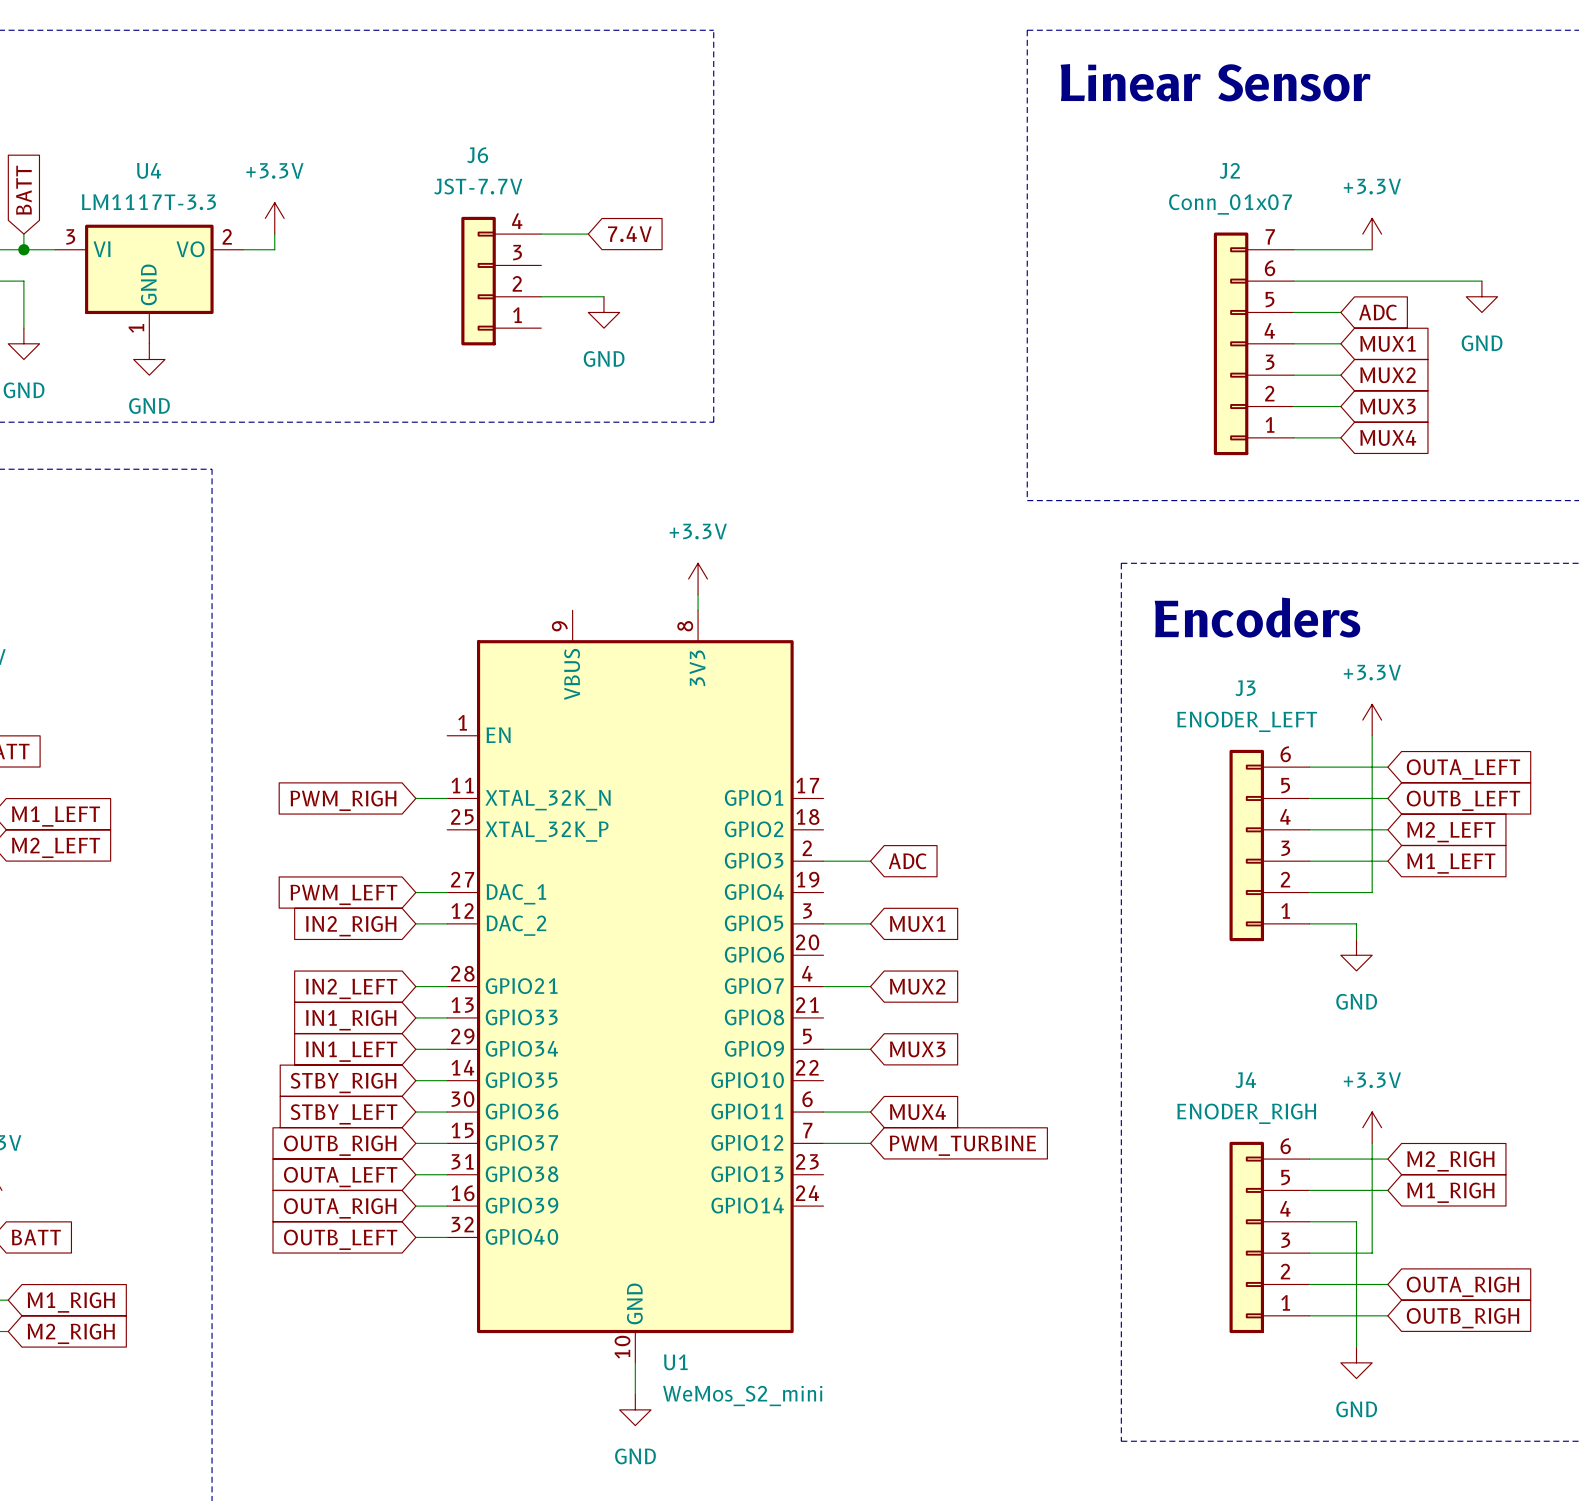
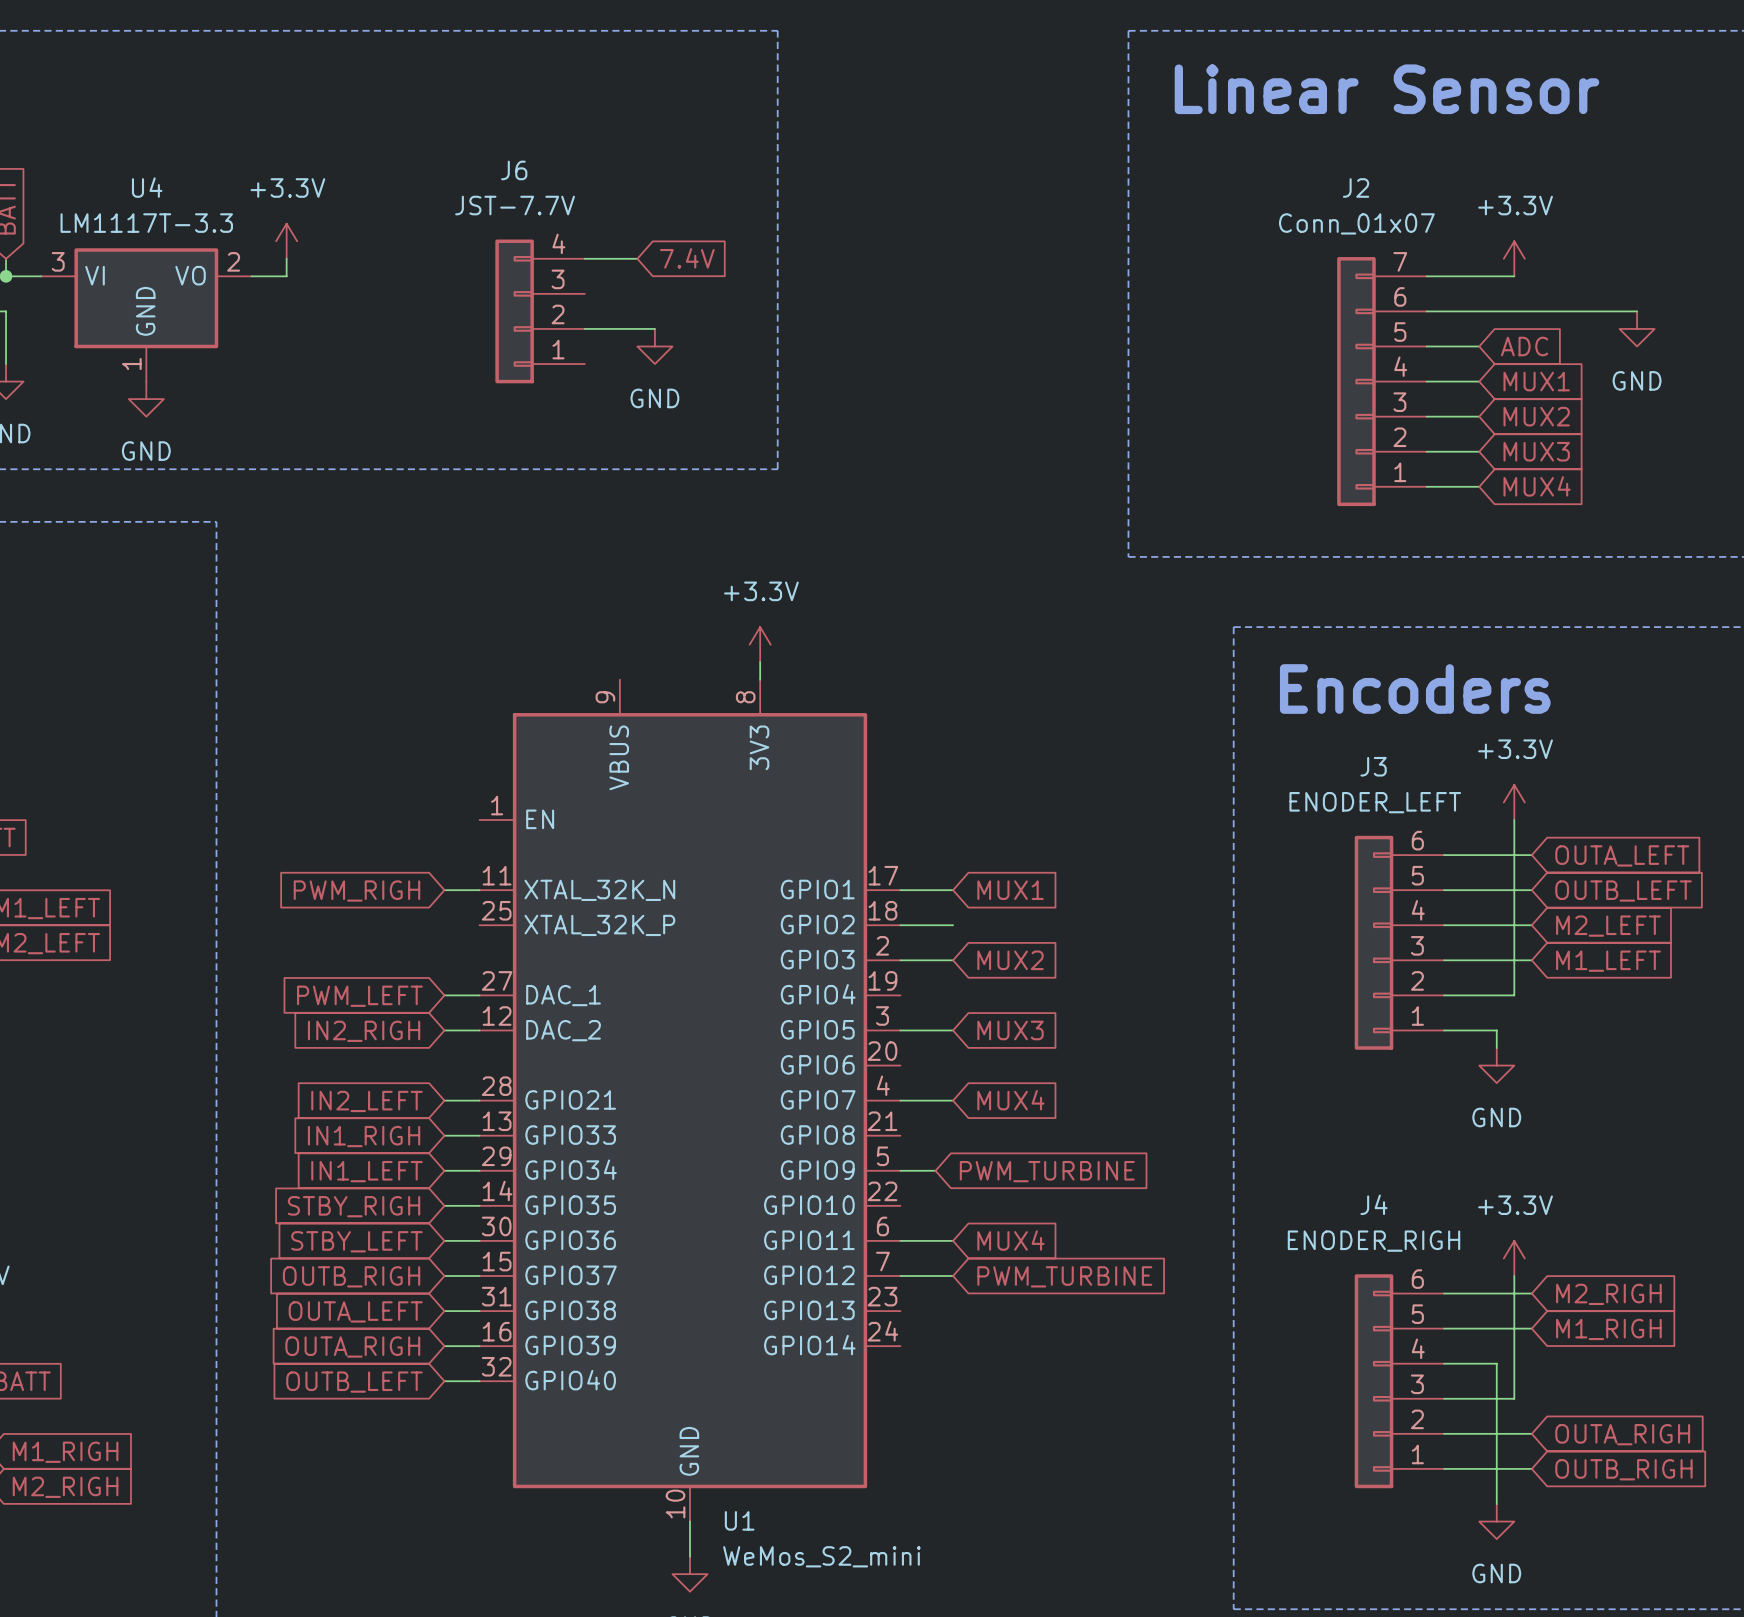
wire: none -> (900, 890) (953, 890)
global label: none -> MUX1 (1010, 890)
wire: none -> (900, 925) (953, 925)
global label: ADC (907, 861) -> MUX2 (1010, 960)
global label: MUX1 (917, 923) -> MUX3 (1010, 1030)
global label: MUX2 (917, 986) -> MUX4 (1010, 1100)
wire: (854, 1049) (870, 1049) -> none
global label: MUX3 (917, 1049) -> none
global label: none -> PWM_TURBINE (1047, 1171)

